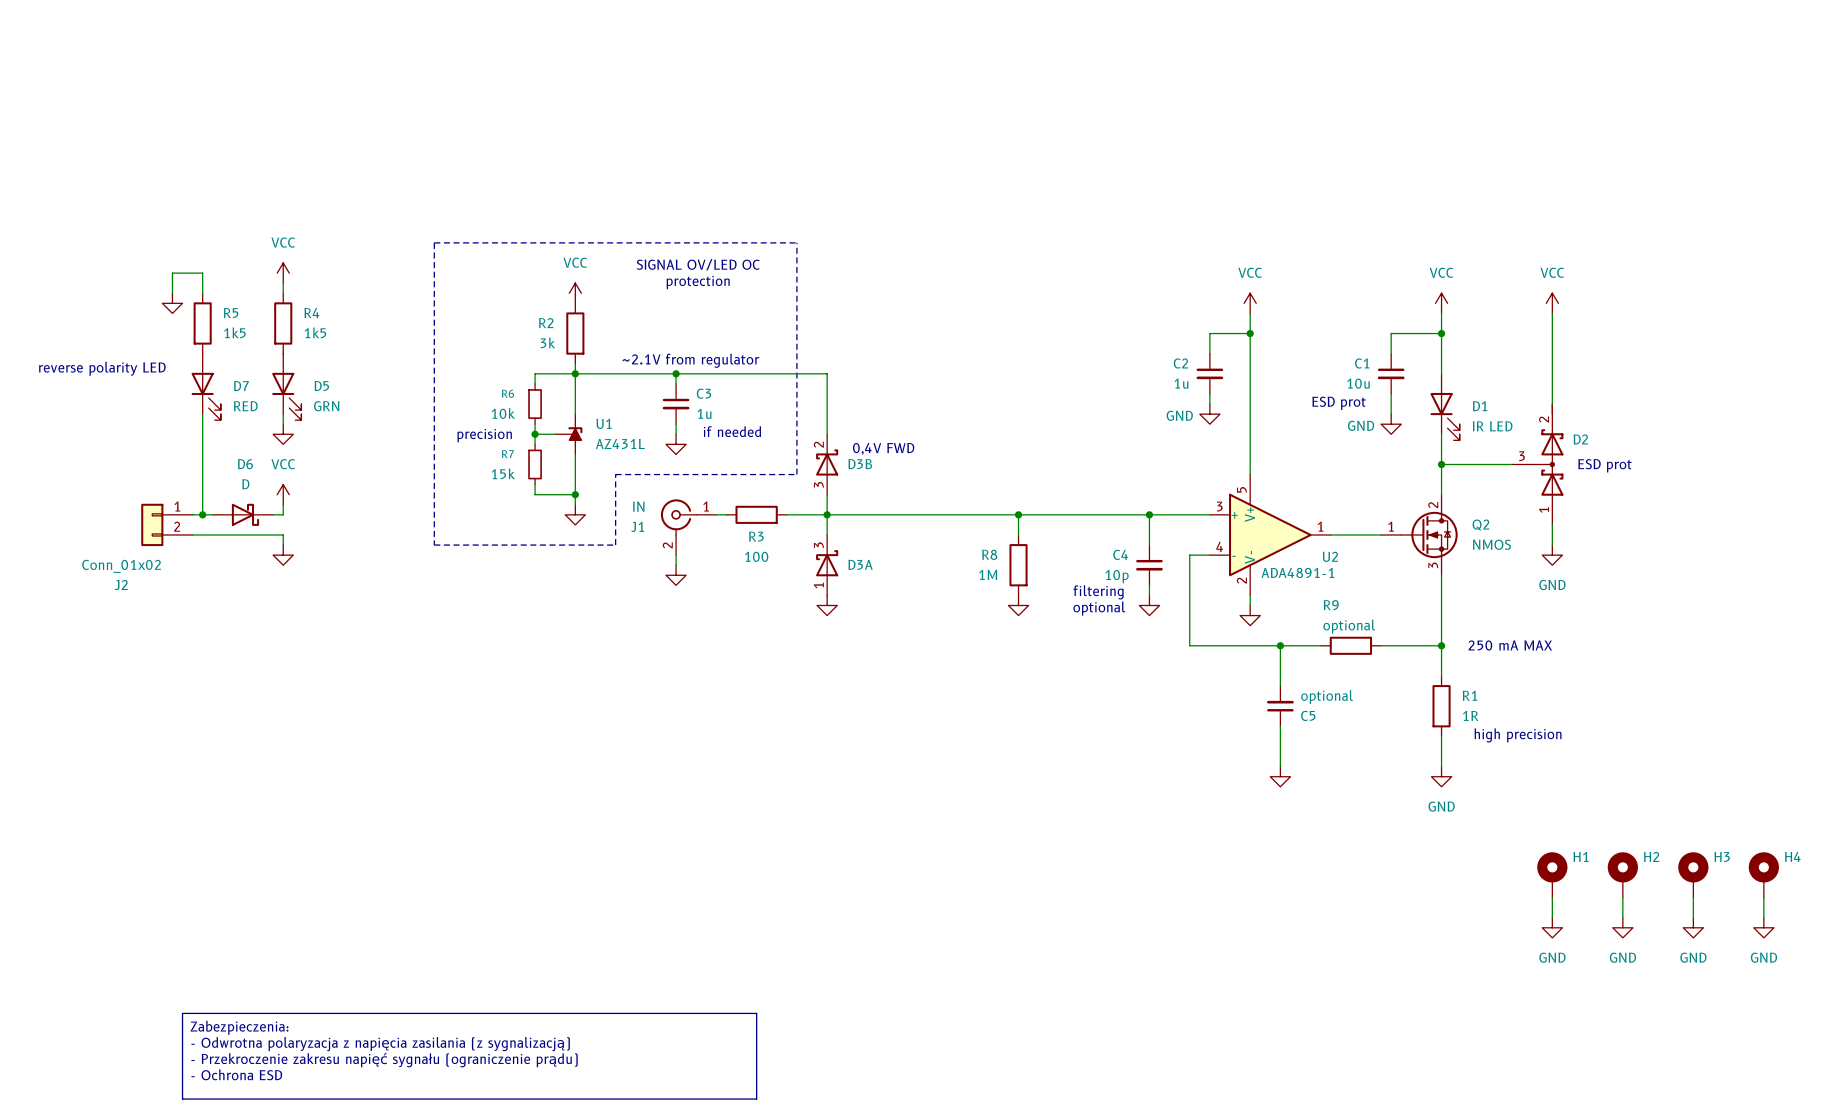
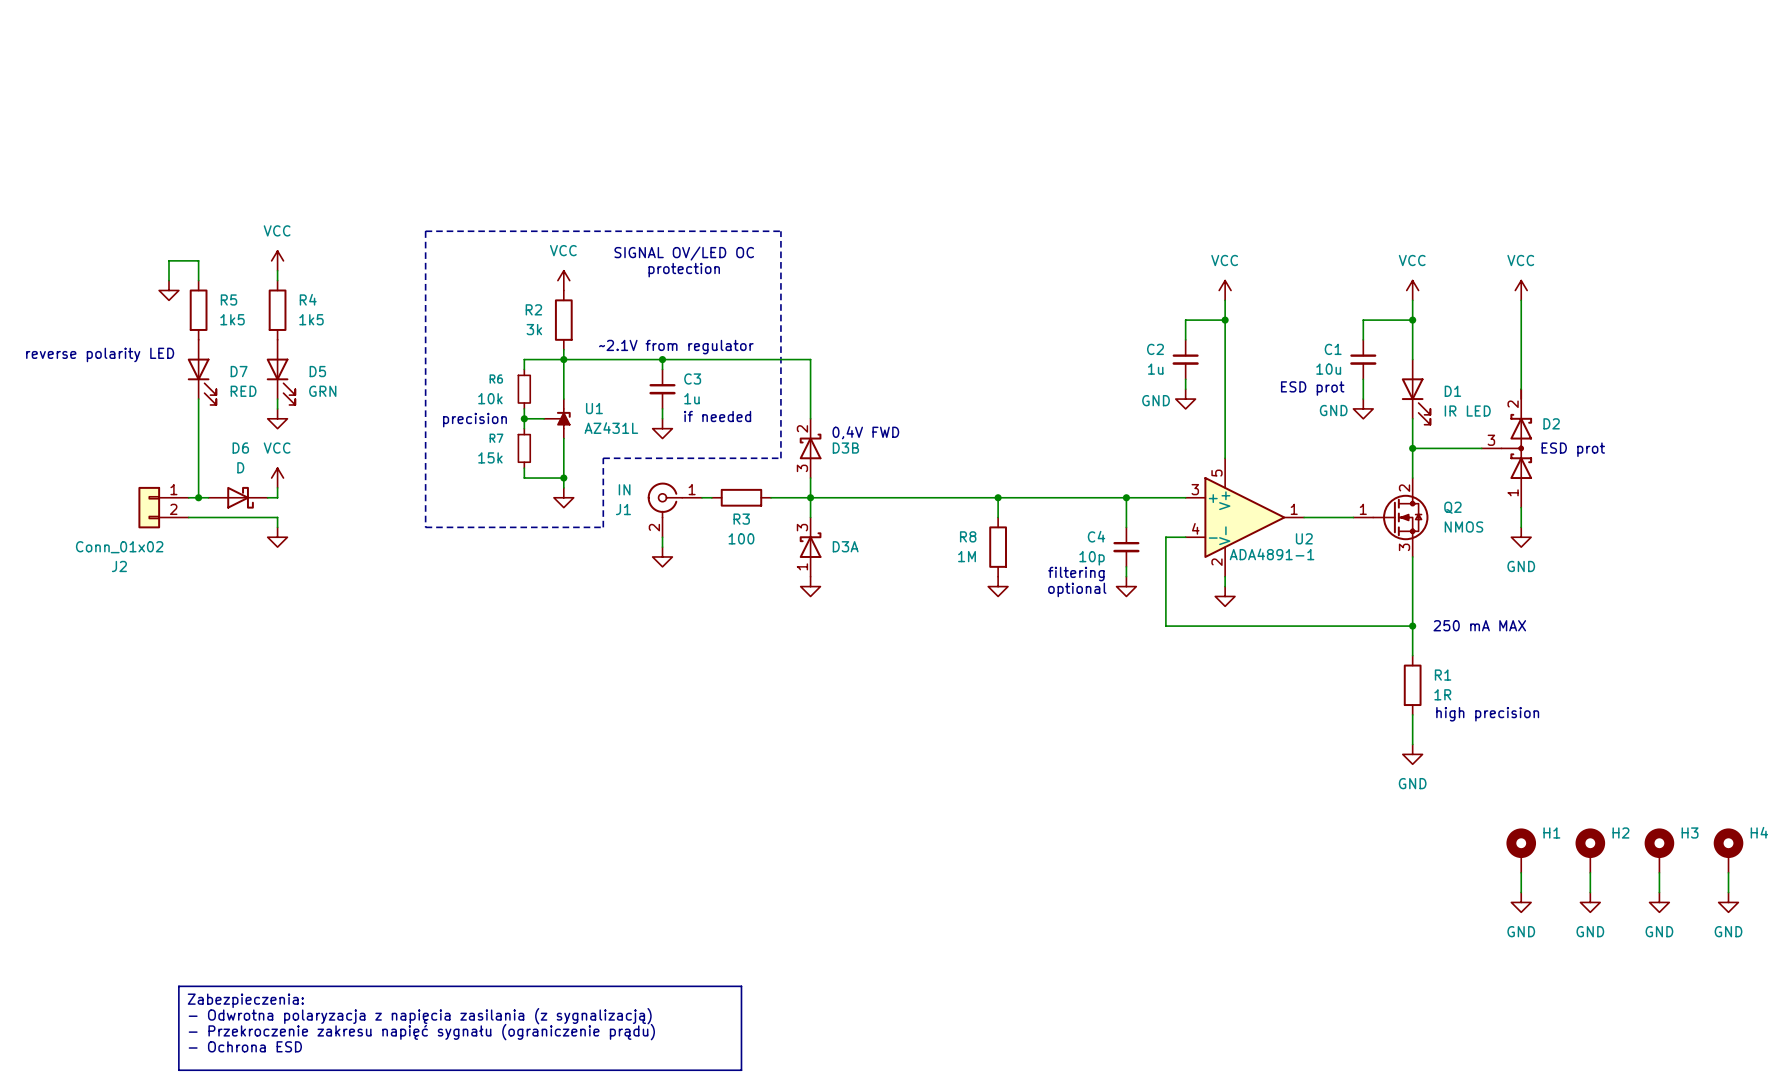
wire: (1280, 645) (1280, 686) -> none
junction: (1280, 645) -> none
wire: none -> (1294, 626) (1353, 626)
R9: optional (1350, 645) -> none
C5: optional (1280, 706) -> none
wire: (1280, 726) (1280, 766) -> none
power symbol: (1280, 776) -> none

